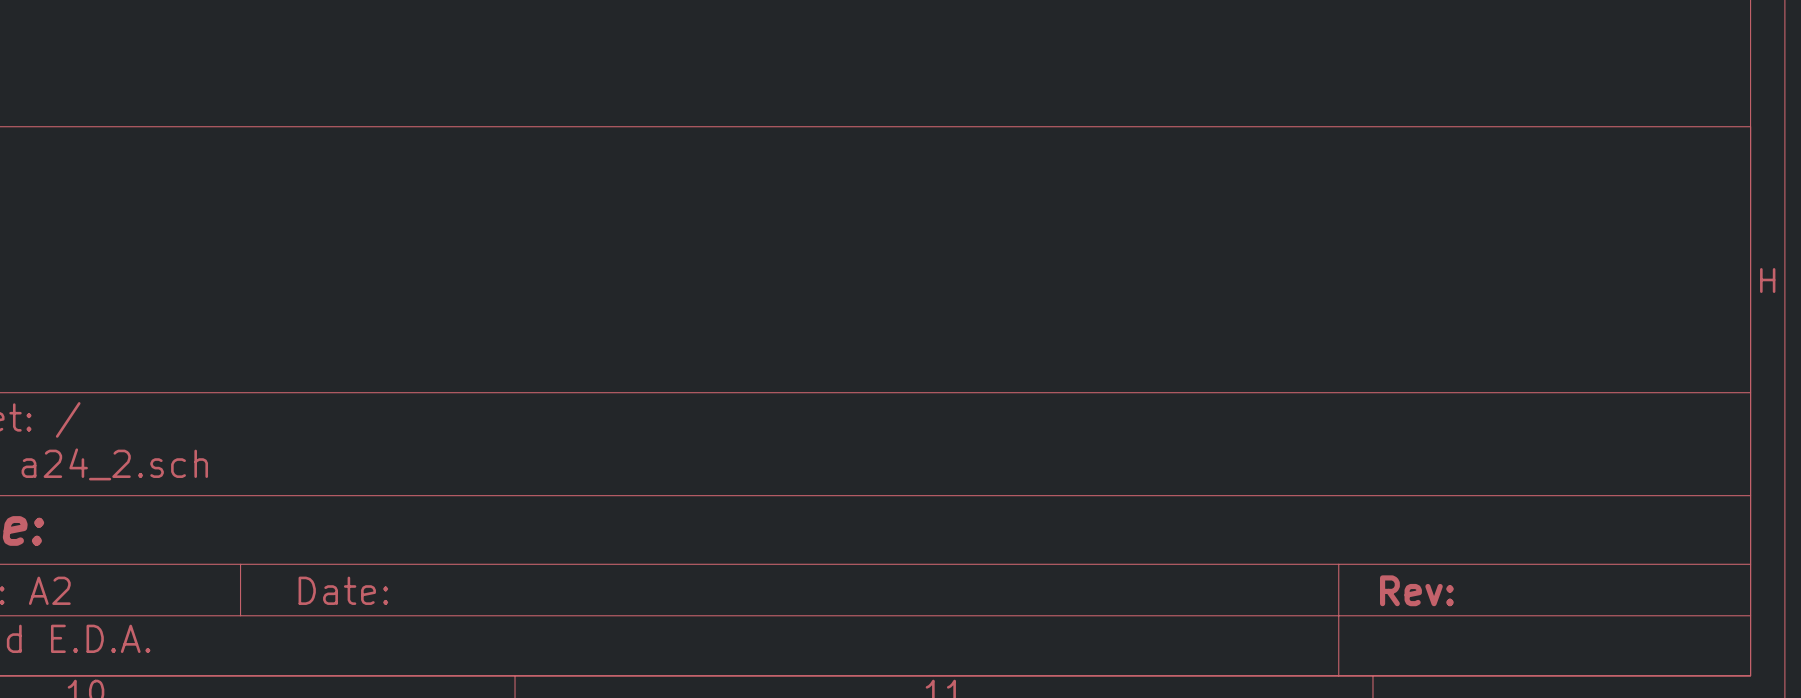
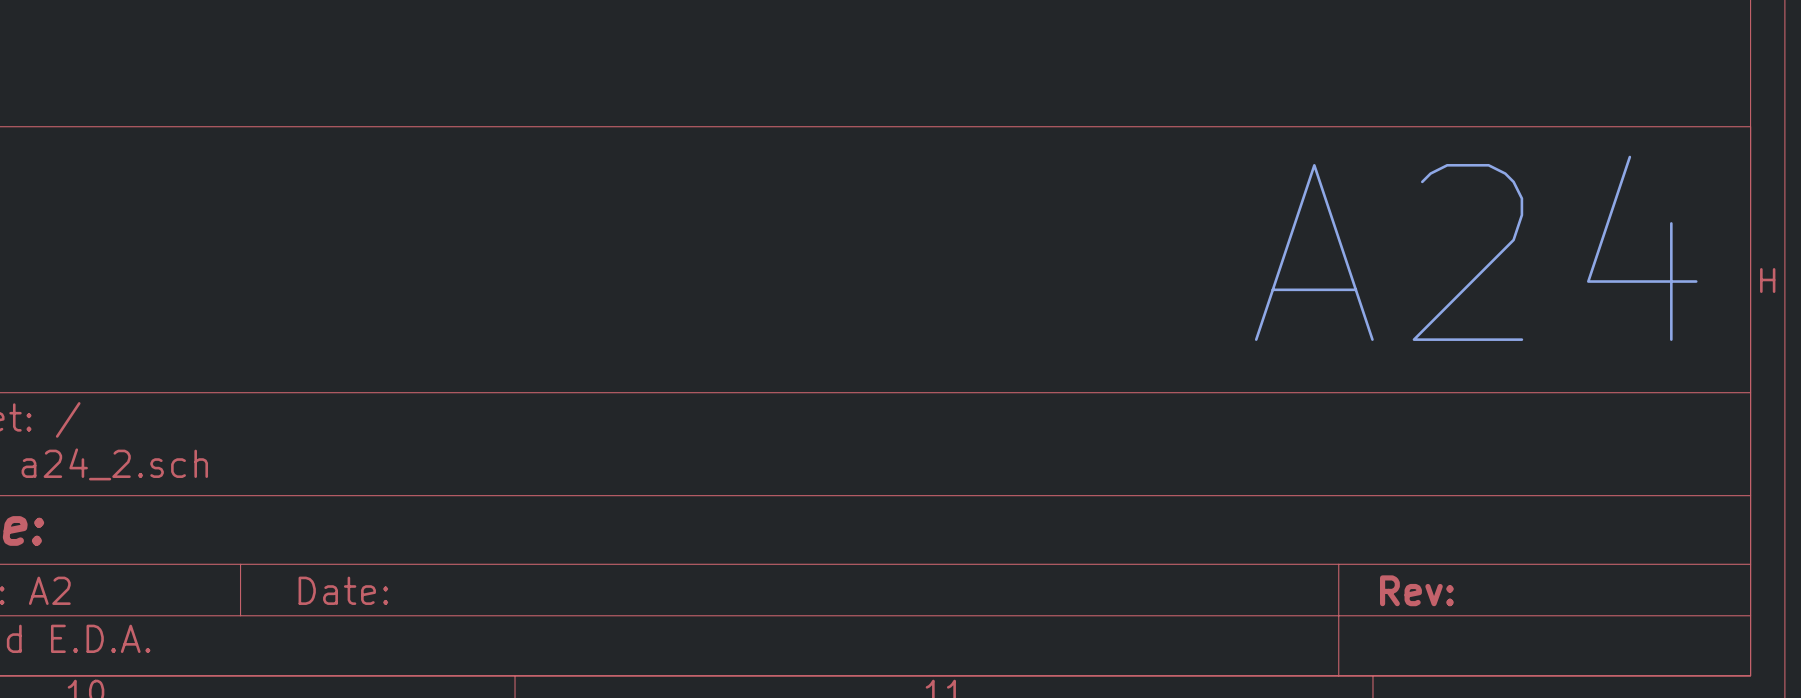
text: none -> A24 (1476, 248)

